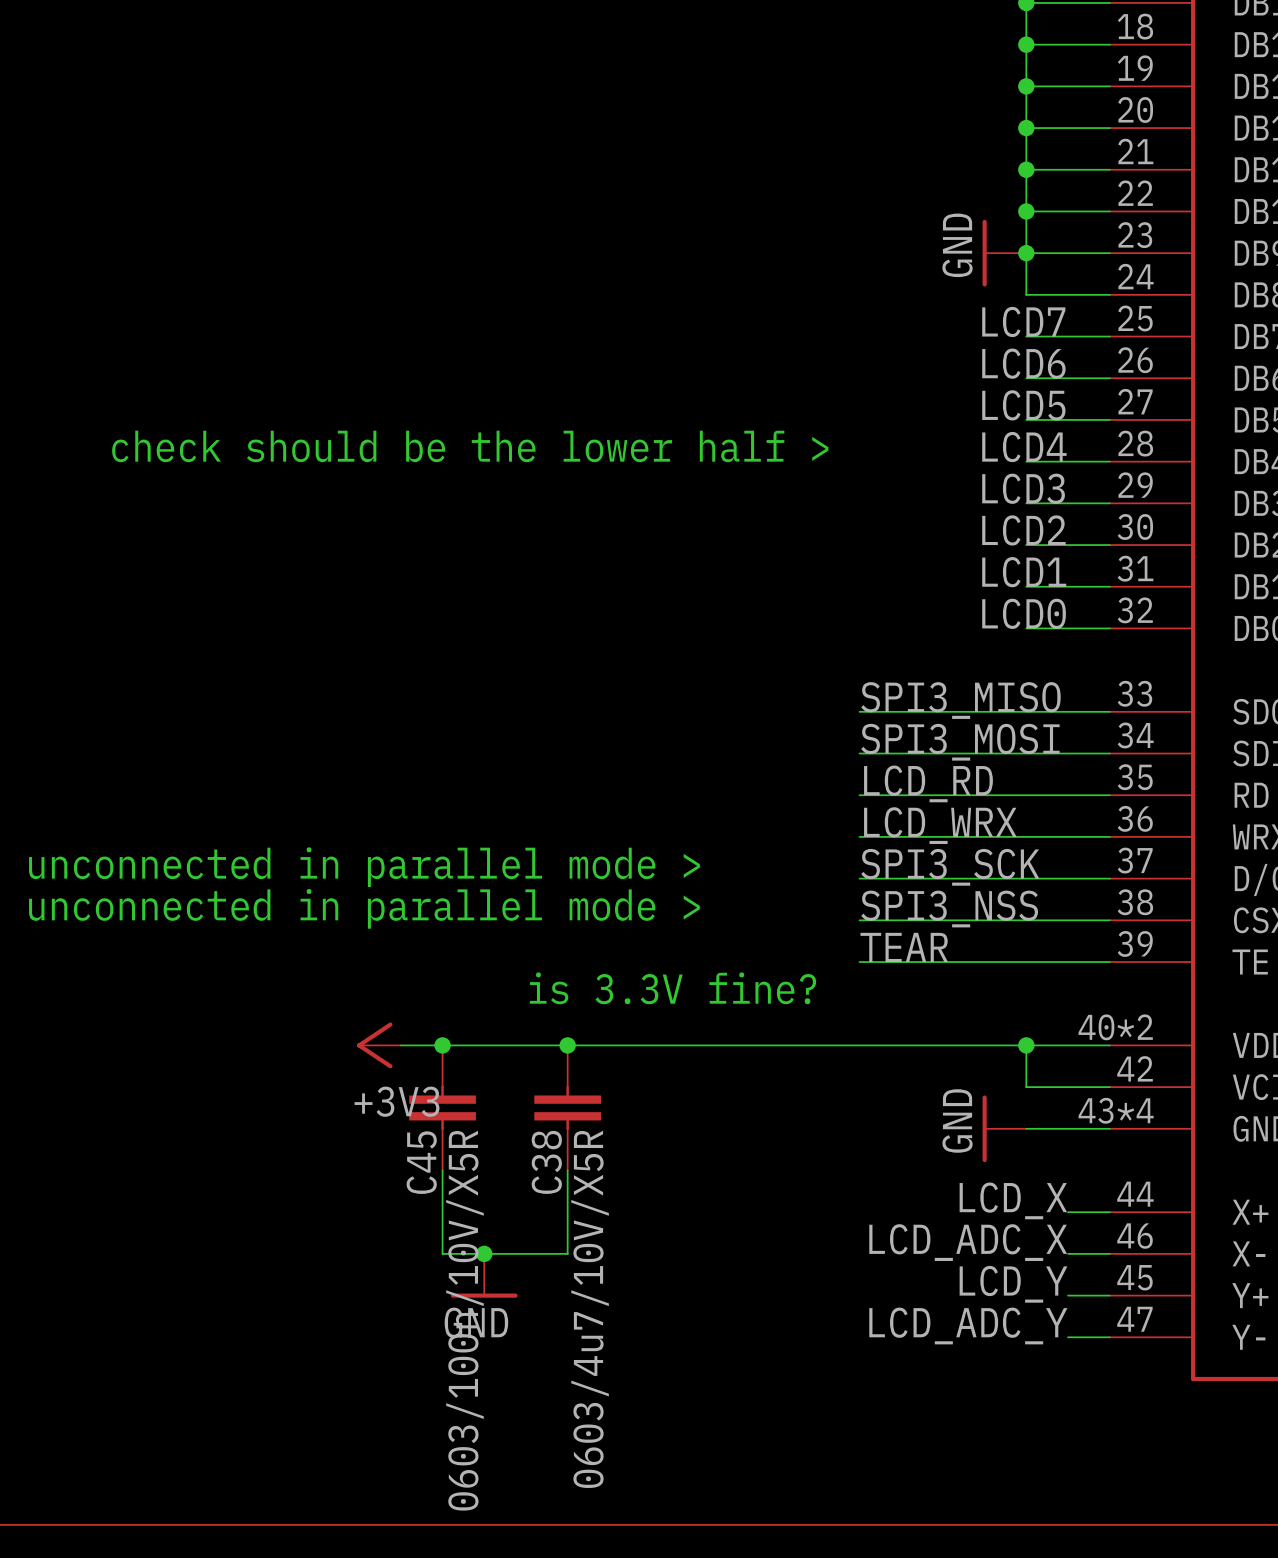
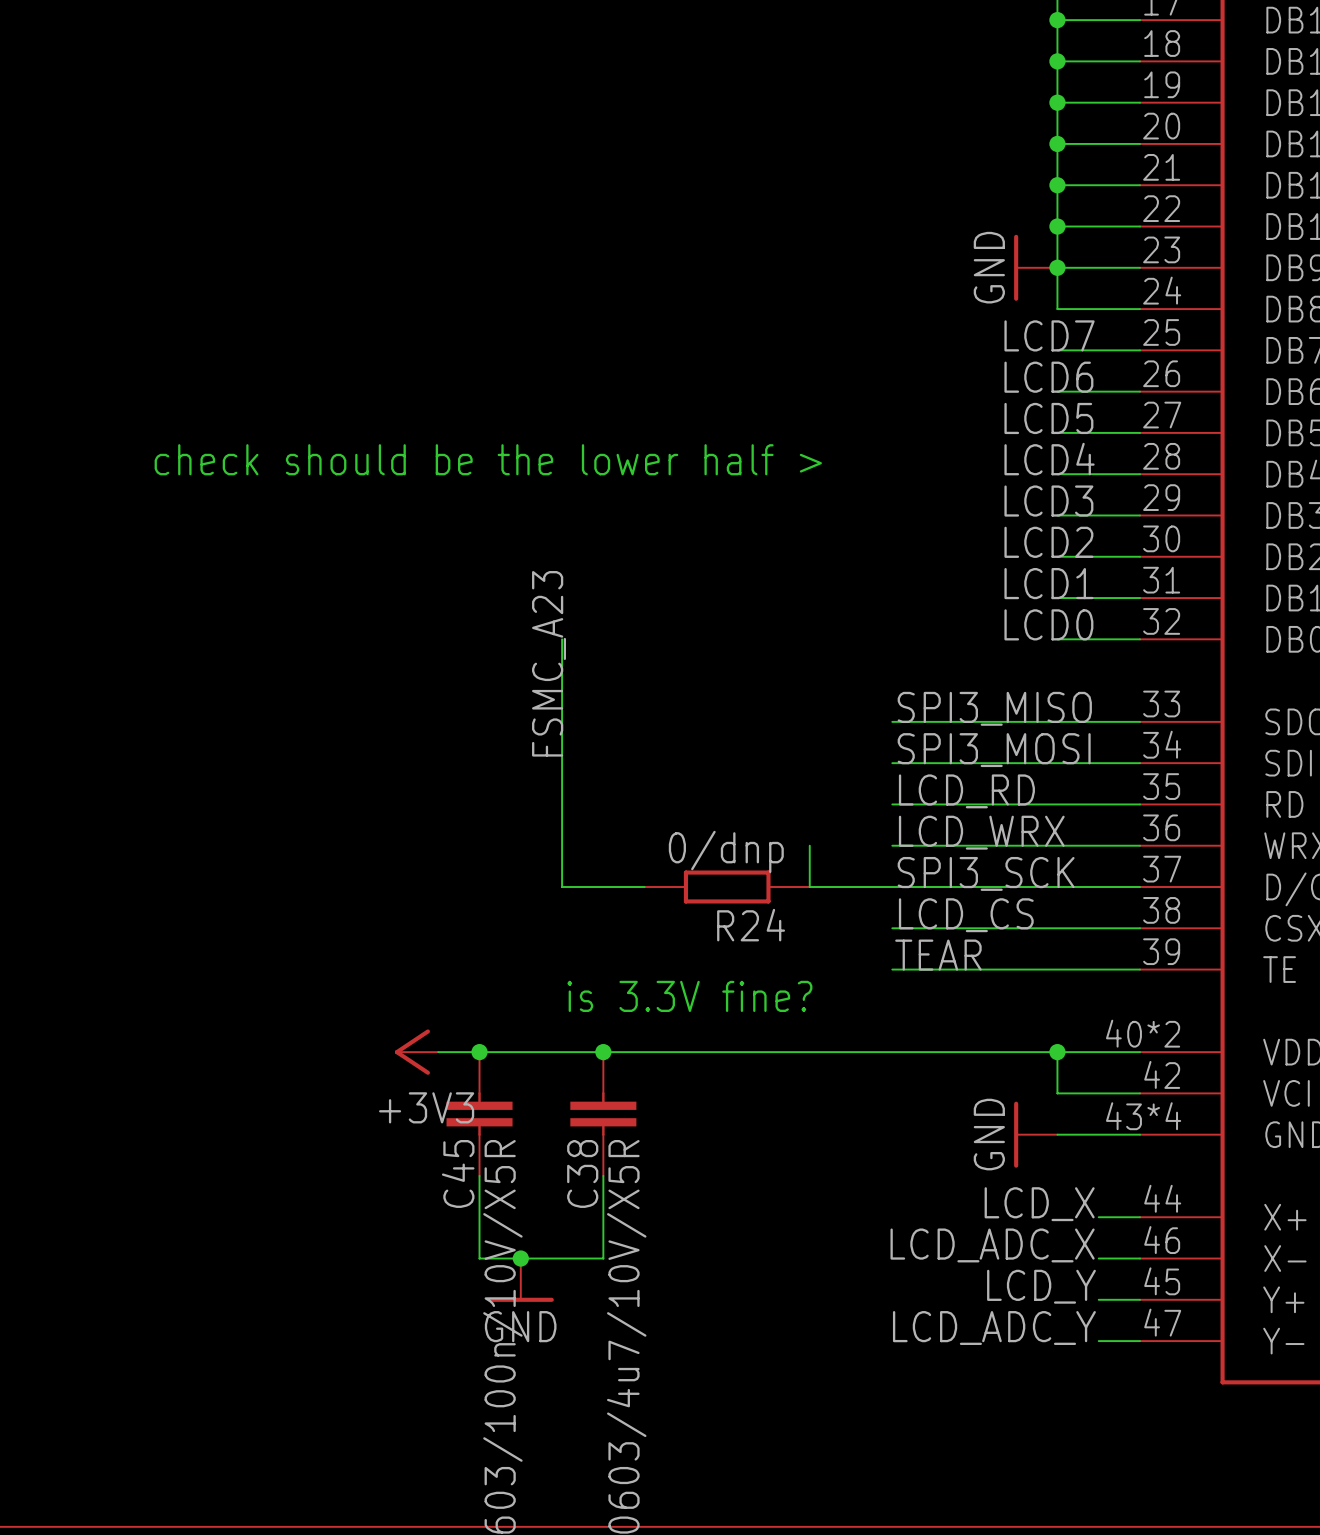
wire: none -> (562, 639) (562, 887) (644, 887)
label: none -> FSMC_A23 (549, 663)
wire: none -> (809, 845) (809, 887) (892, 887)
text: unconnected in parallel mode > (364, 867) -> none
R24: none -> 0/dnp (727, 887)
text: unconnected in parallel mode > (364, 908) -> none
label: SPI3_NSS (949, 909) -> LCD_CS (966, 915)

